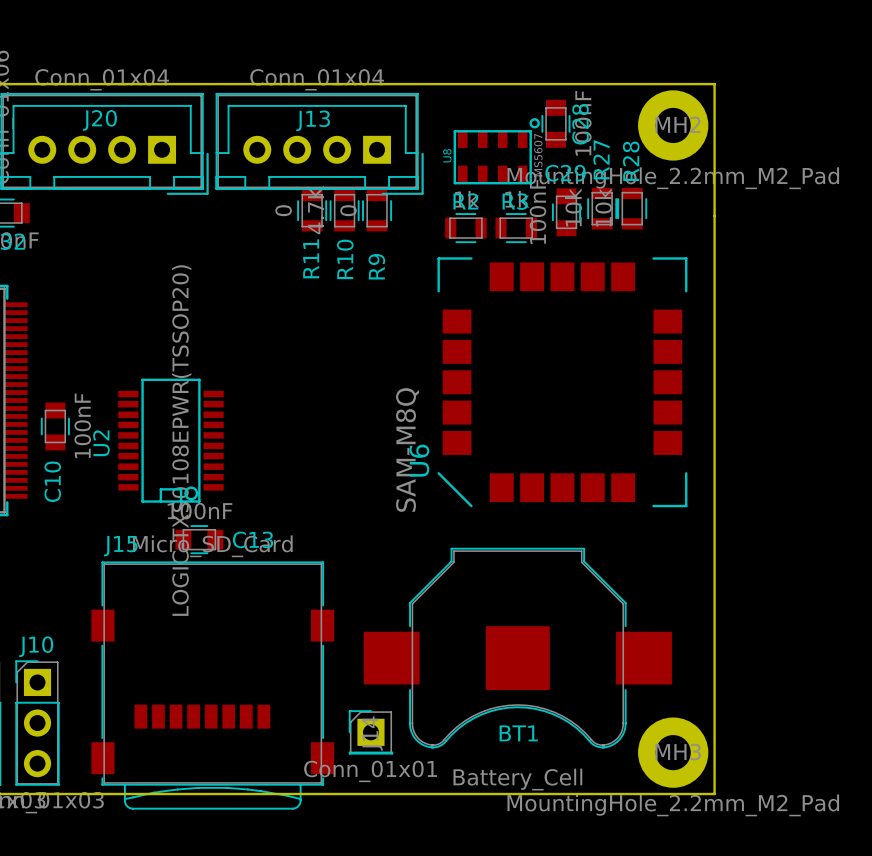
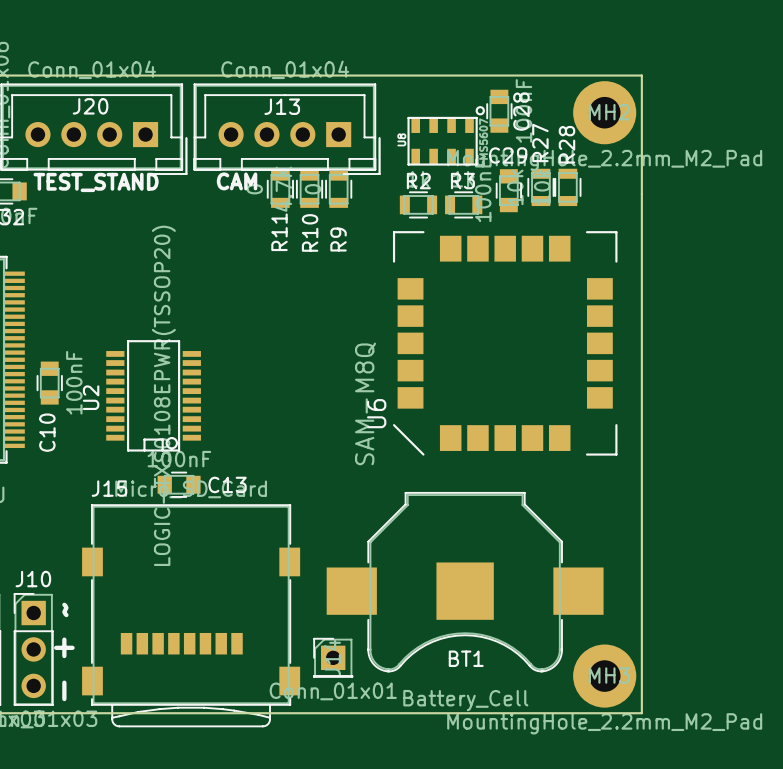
text: none -> CAM (237, 181)
text: none -> TEST_STAND (96, 182)
text: none -> ~ + - (64, 651)

